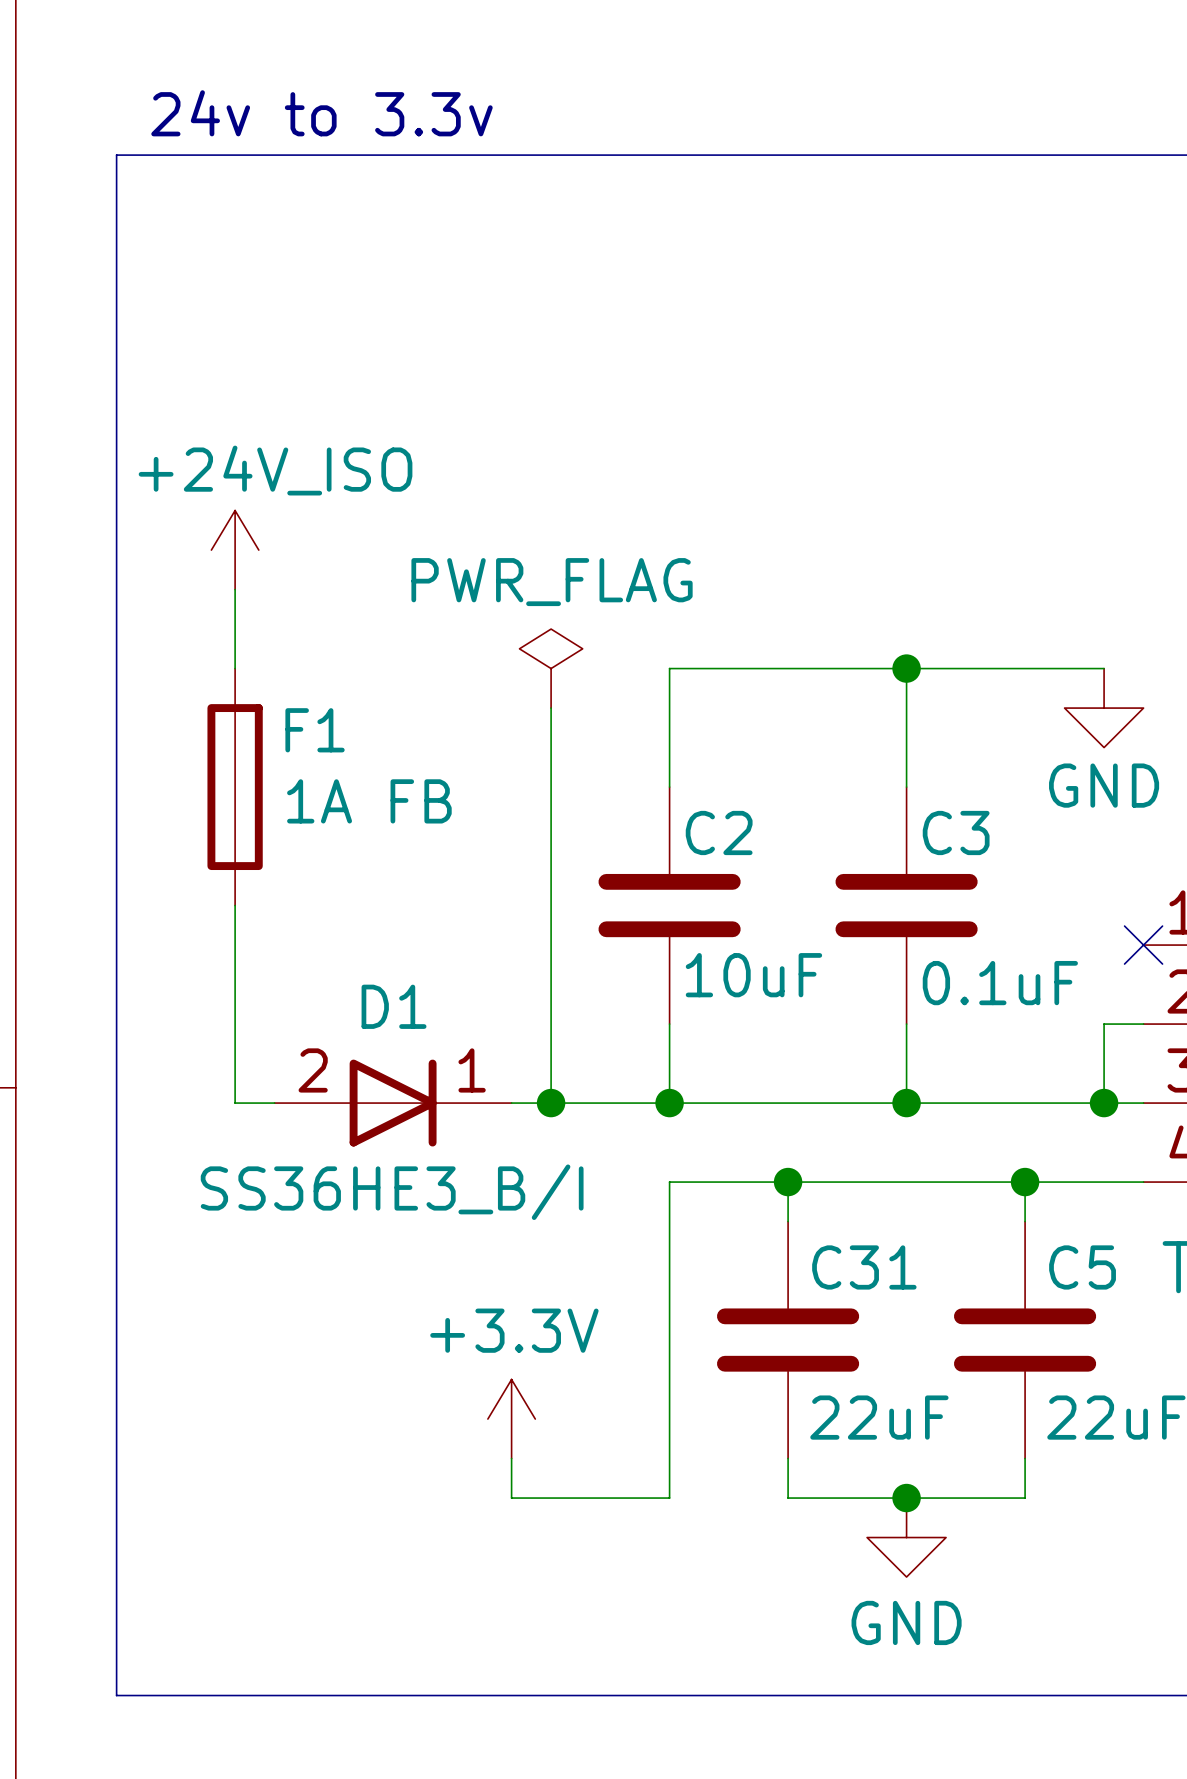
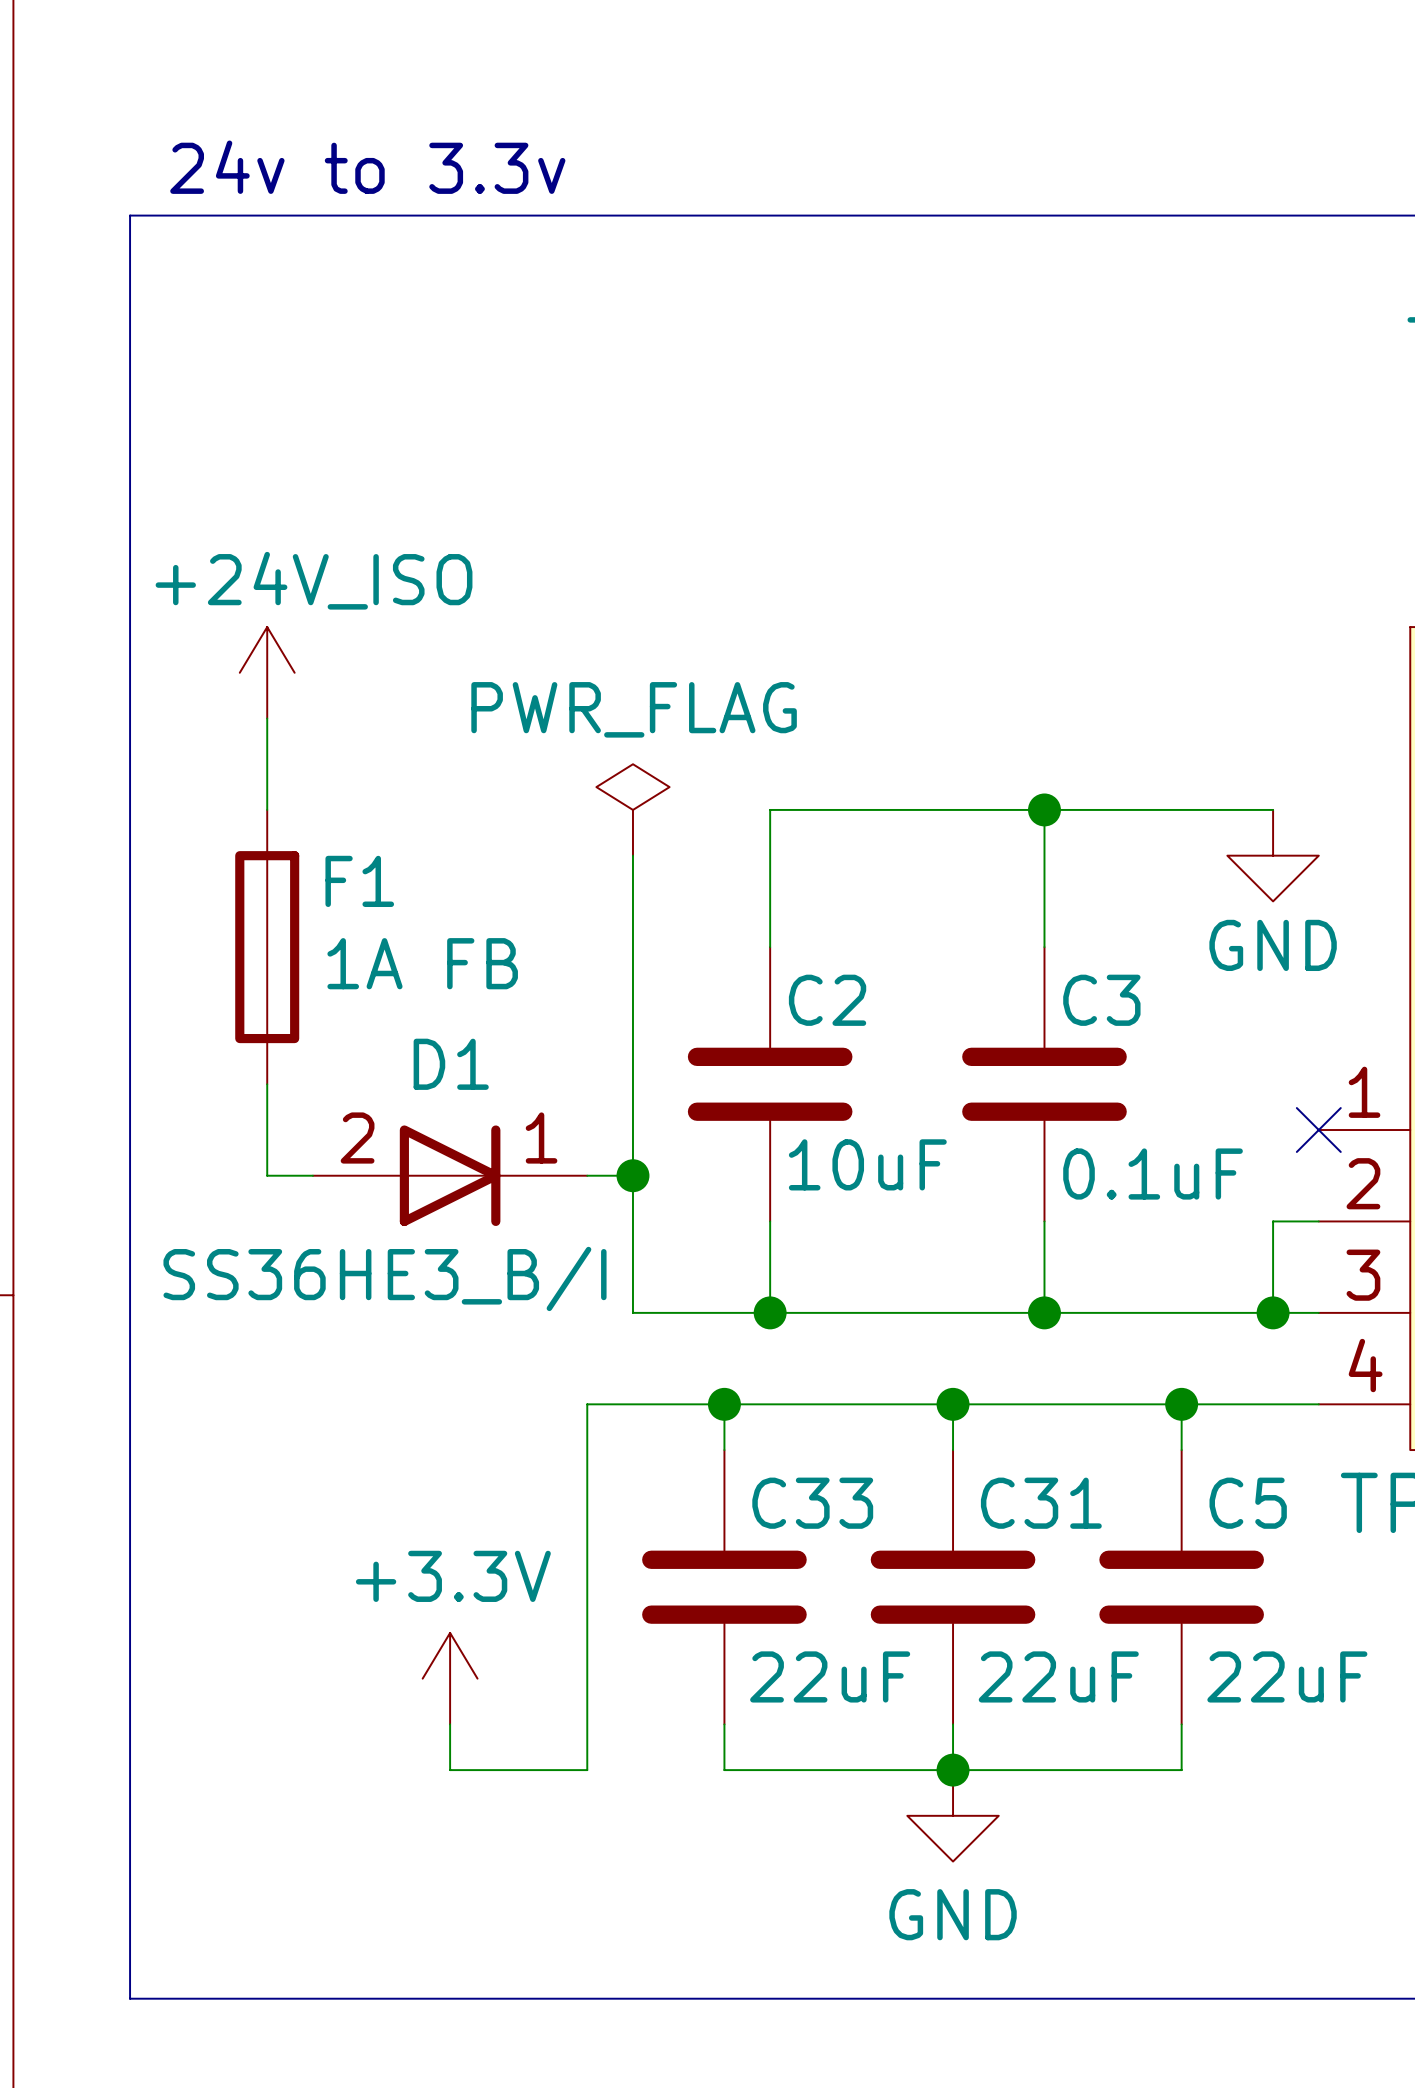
wire: (235, 984) (235, 1103) (274, 1103) -> (267, 1175) (312, 1175)
junction: none -> (632, 1175)
D1 position: (393, 1103) -> (450, 1175)
wire: (511, 1103) (551, 1103) -> (587, 1175) (632, 1175)
junction: (551, 1103) -> none
wire: none -> (724, 1404) (724, 1450)
junction: none -> (724, 1404)
wire: (669, 1182) (669, 1498) -> (770, 1404) (587, 1404) (587, 1724)
wire: (788, 1182) (788, 1221) -> (953, 1404) (953, 1450)
junction position: (788, 1182) -> (953, 1404)
D1 value position: SS36HE3_B/I (392, 1192) -> SS36HE3_B/I (385, 1278)
C33: none -> 22uF (724, 1587)
C31 position: (788, 1340) -> (953, 1587)
power symbol position: +3.3V (511, 1419) -> +3.3V (450, 1678)
wire: none -> (450, 1724) (450, 1770) (587, 1770)
wire: (788, 1458) (788, 1498) -> (770, 1770) (907, 1770)
wire: none -> (953, 1724) (953, 1770)
wire: (511, 1498) (630, 1498) -> (724, 1724) (724, 1770)
junction position: (906, 1498) -> (953, 1770)
power symbol position: GND (906, 1537) -> GND (953, 1815)

